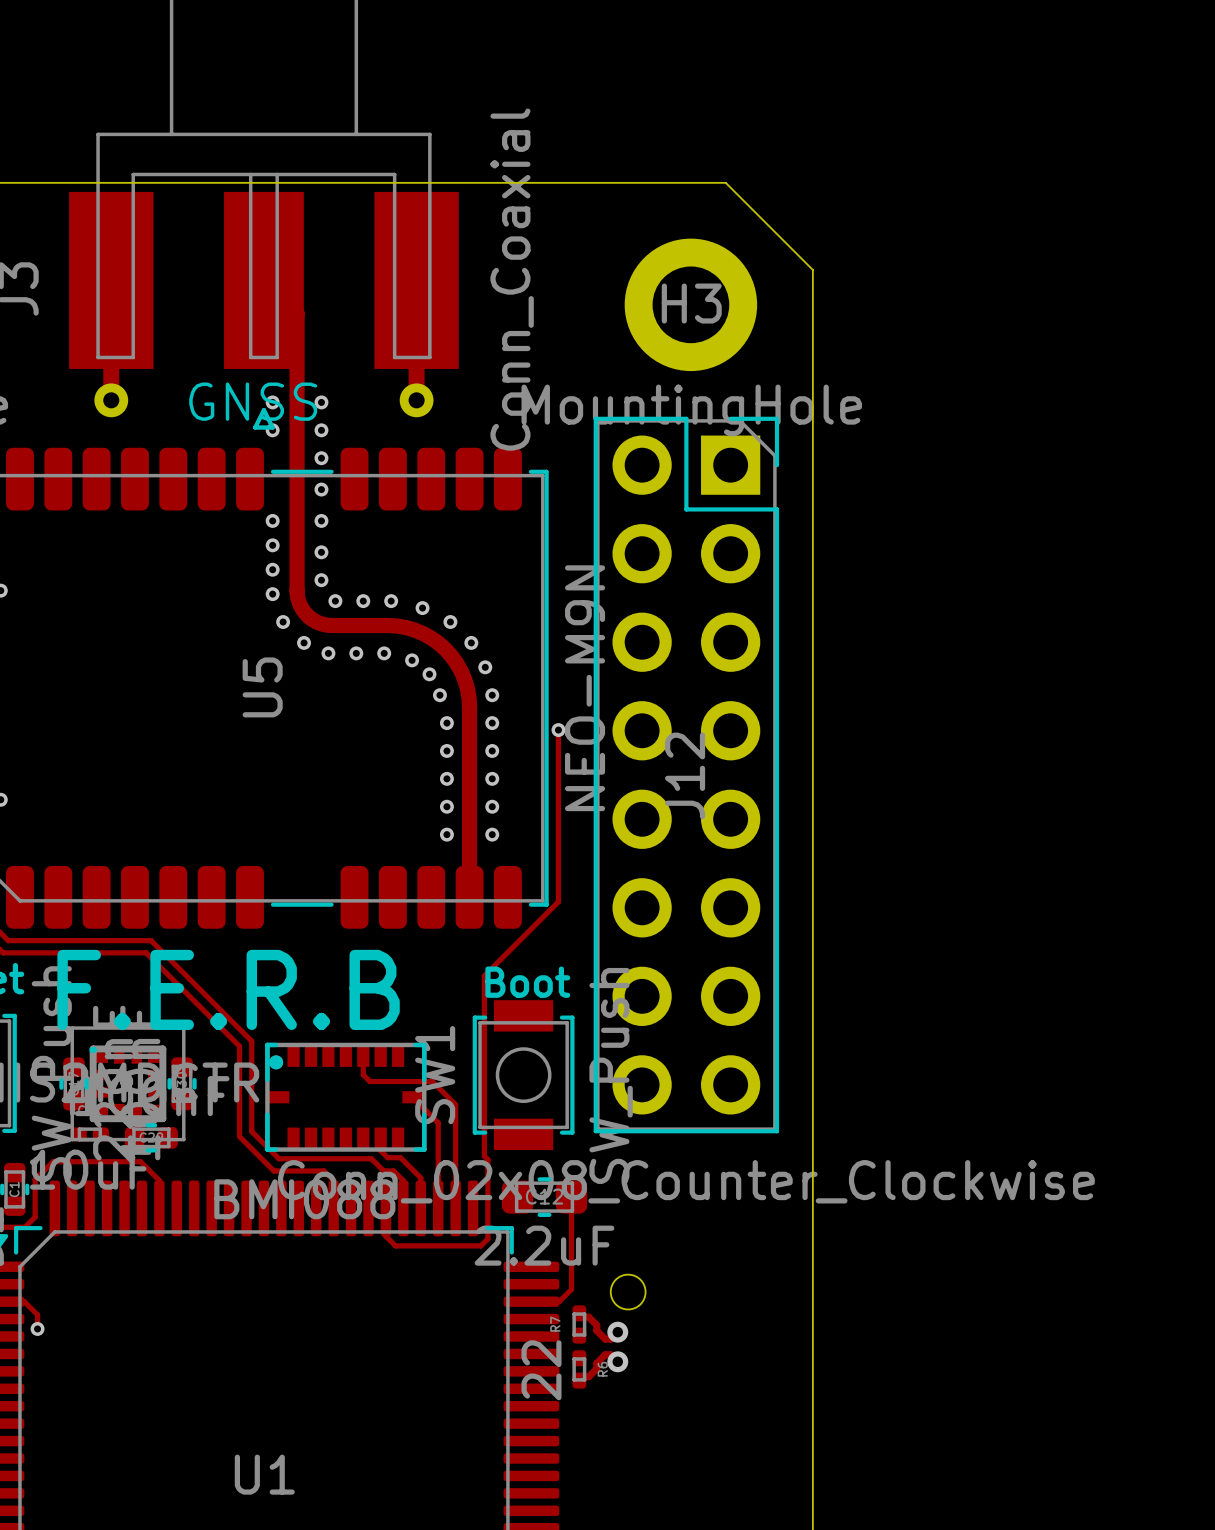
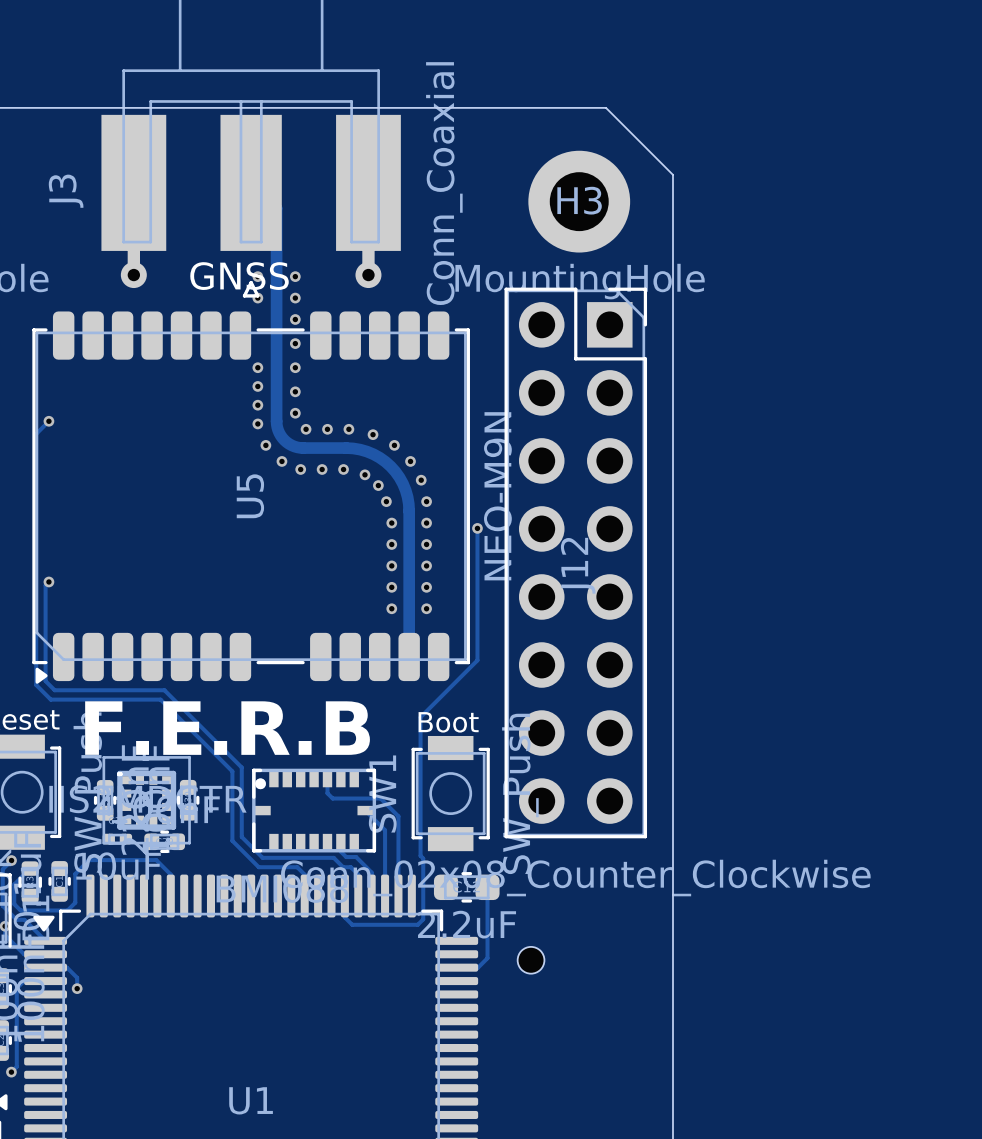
track: (579, 1313) (583, 1317) (588, 1317) (596, 1325) (596, 1330) (605, 1339) (610, 1339) (617, 1332) -> none
R7: (579, 1324) -> none
via: (617, 1332) -> none
track: (617, 1361) (610, 1354) (605, 1354) (596, 1363) (596, 1368) (588, 1376) (583, 1376) (579, 1380) -> none
via: (617, 1361) -> none
R6: 22 (579, 1369) -> none

